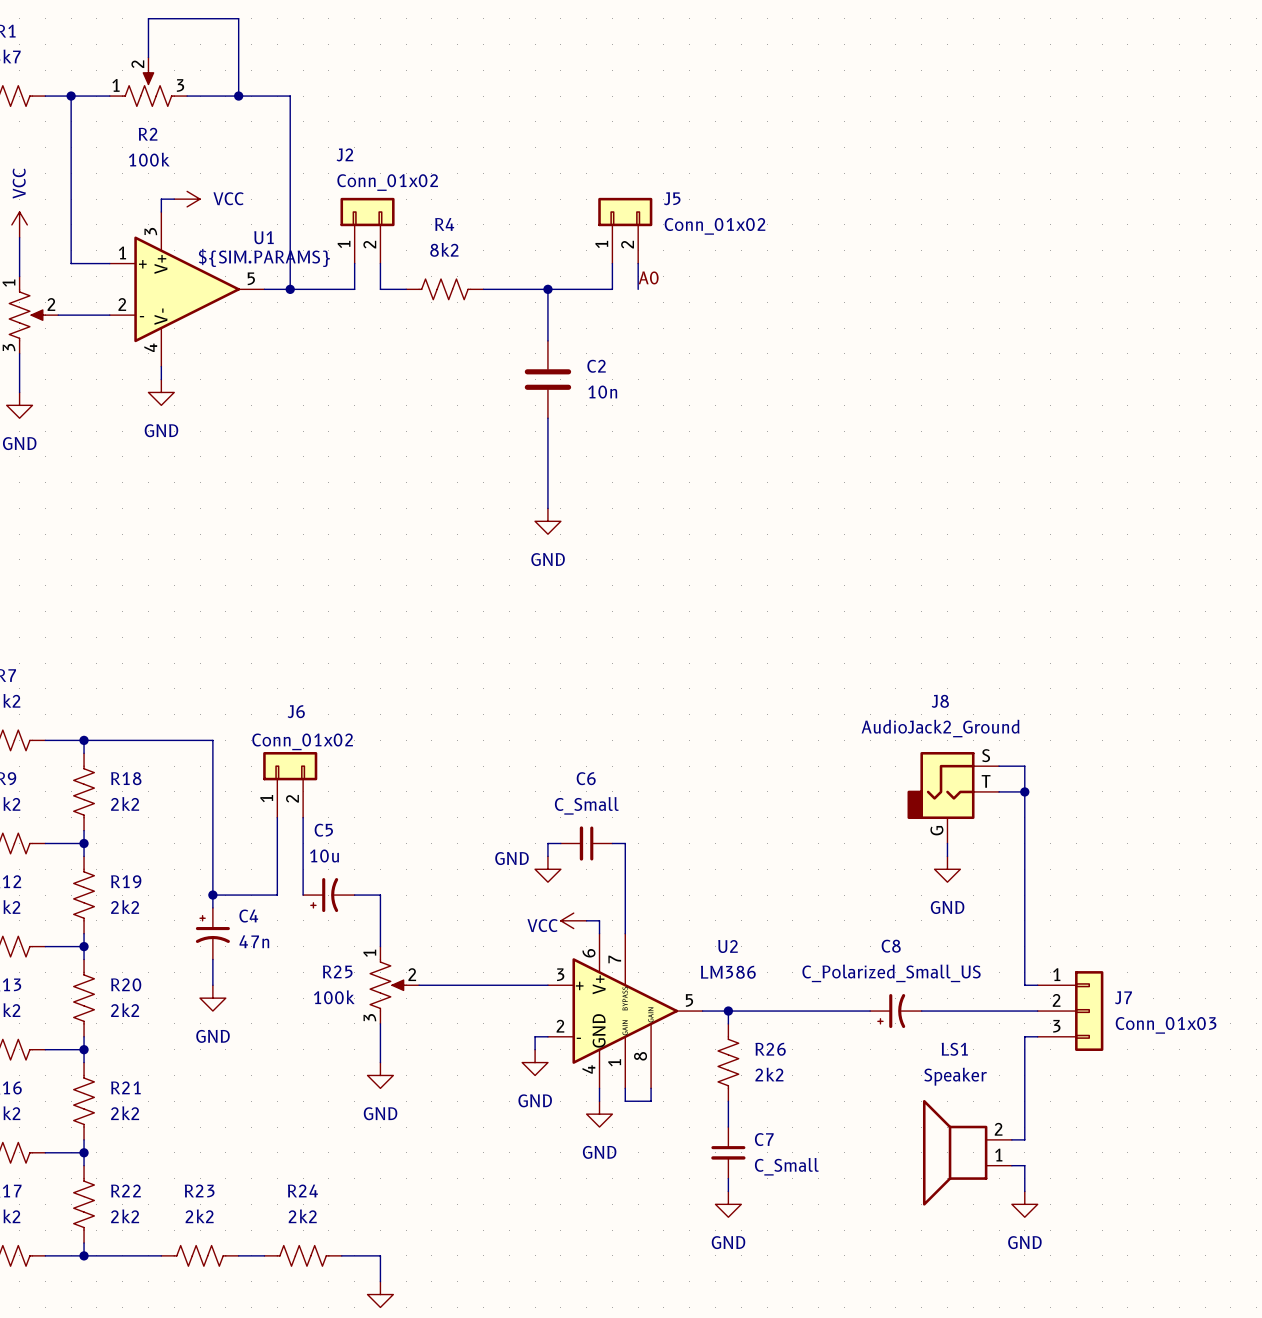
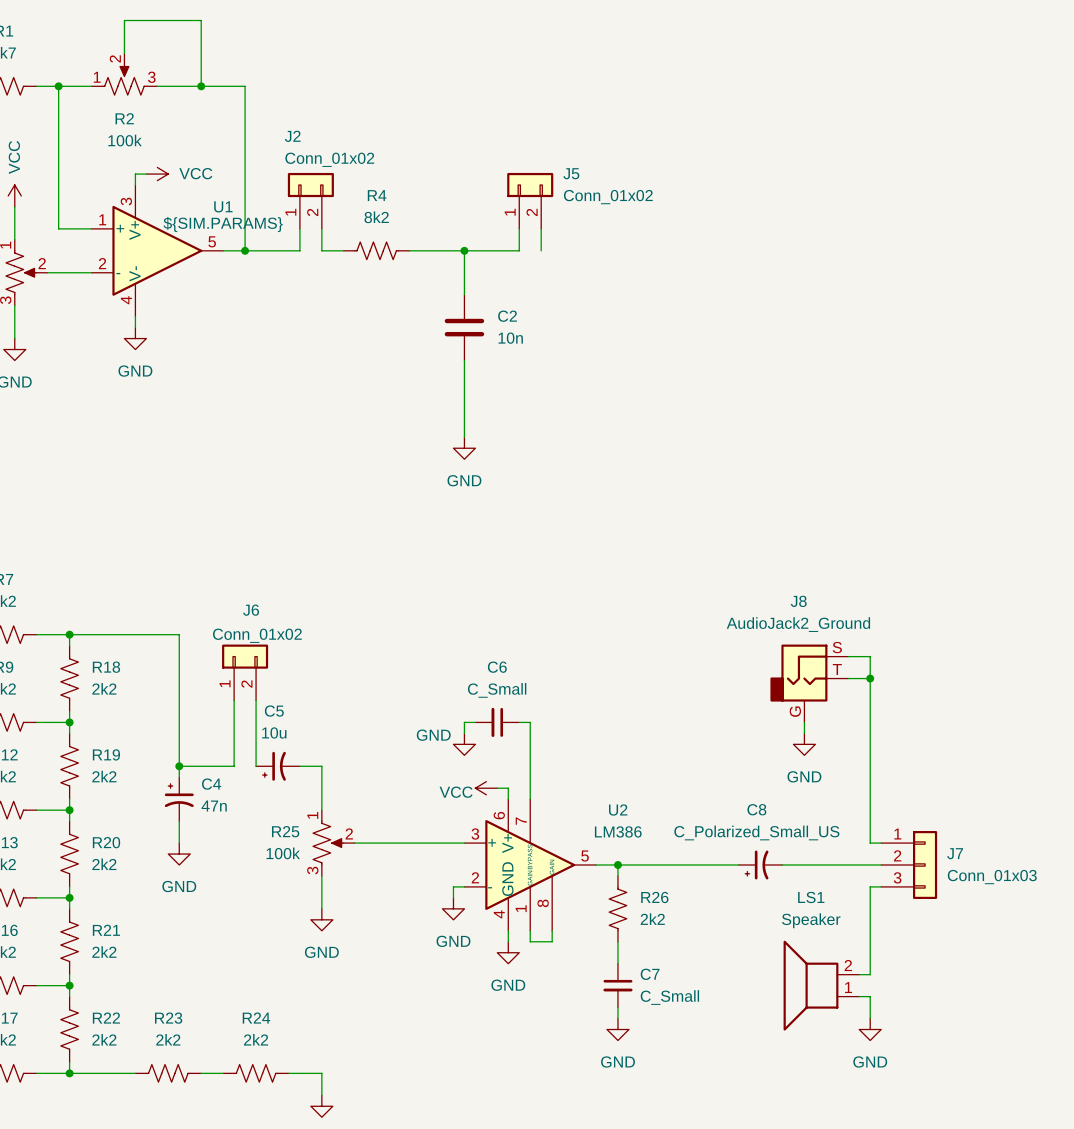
label: A0 (648, 277) -> none

